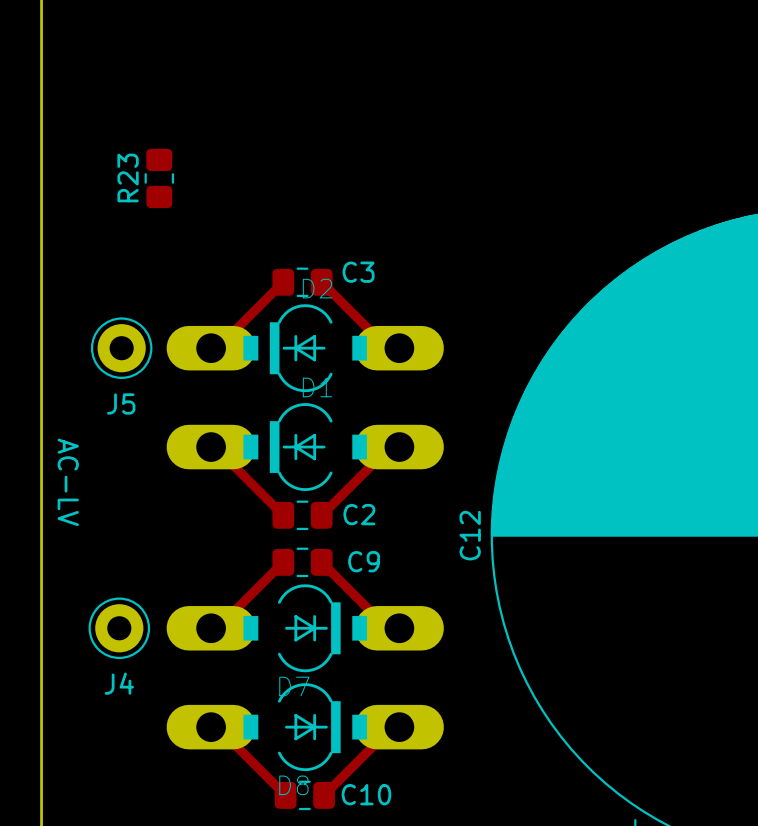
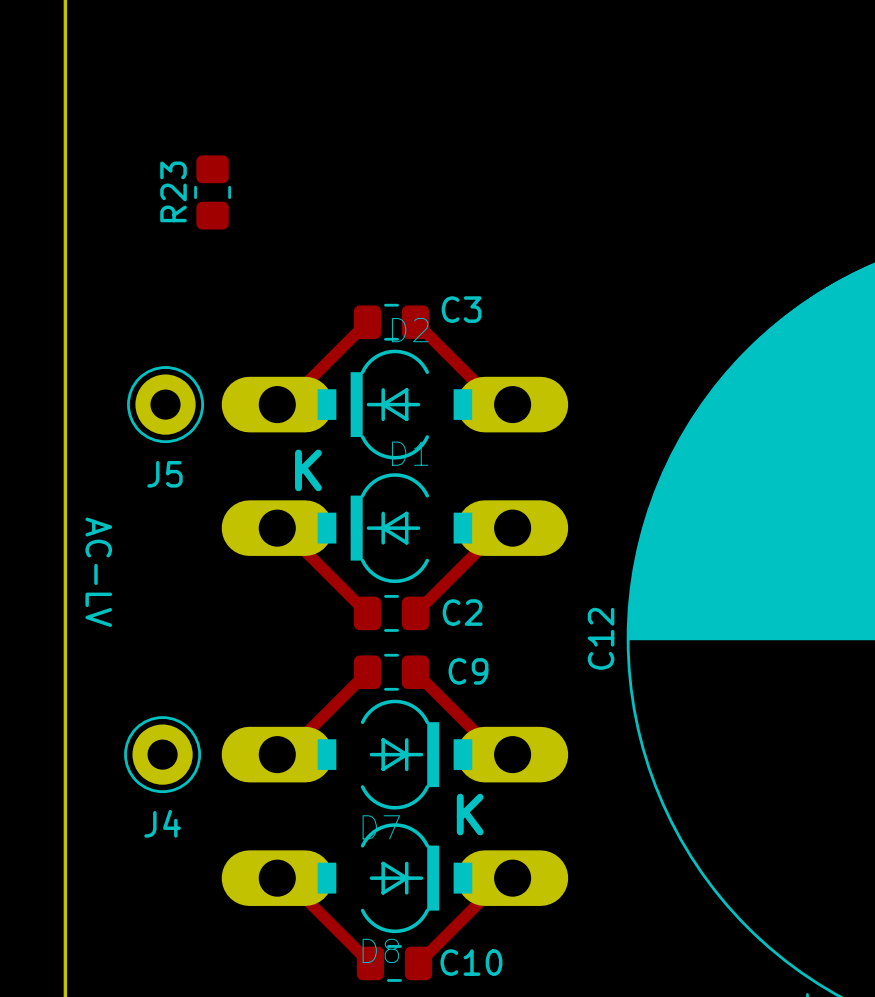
text: none -> K (308, 470)
text: none -> K (470, 814)

